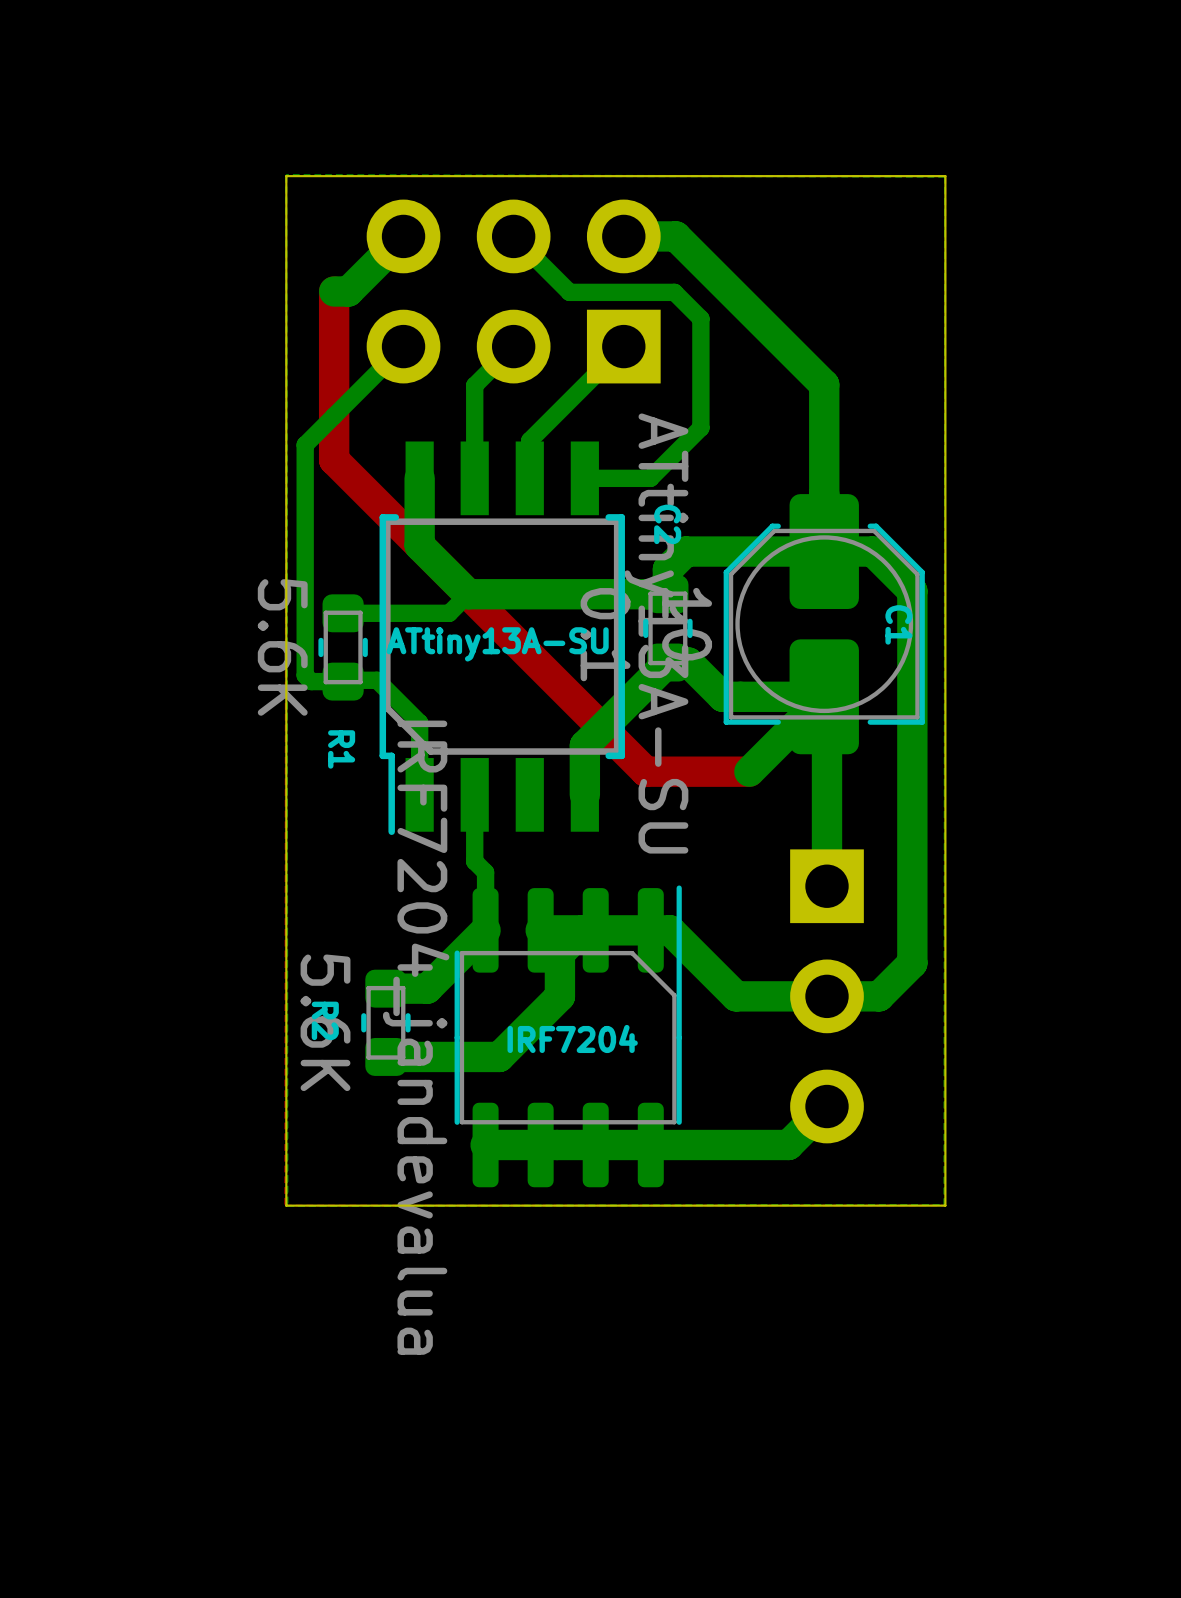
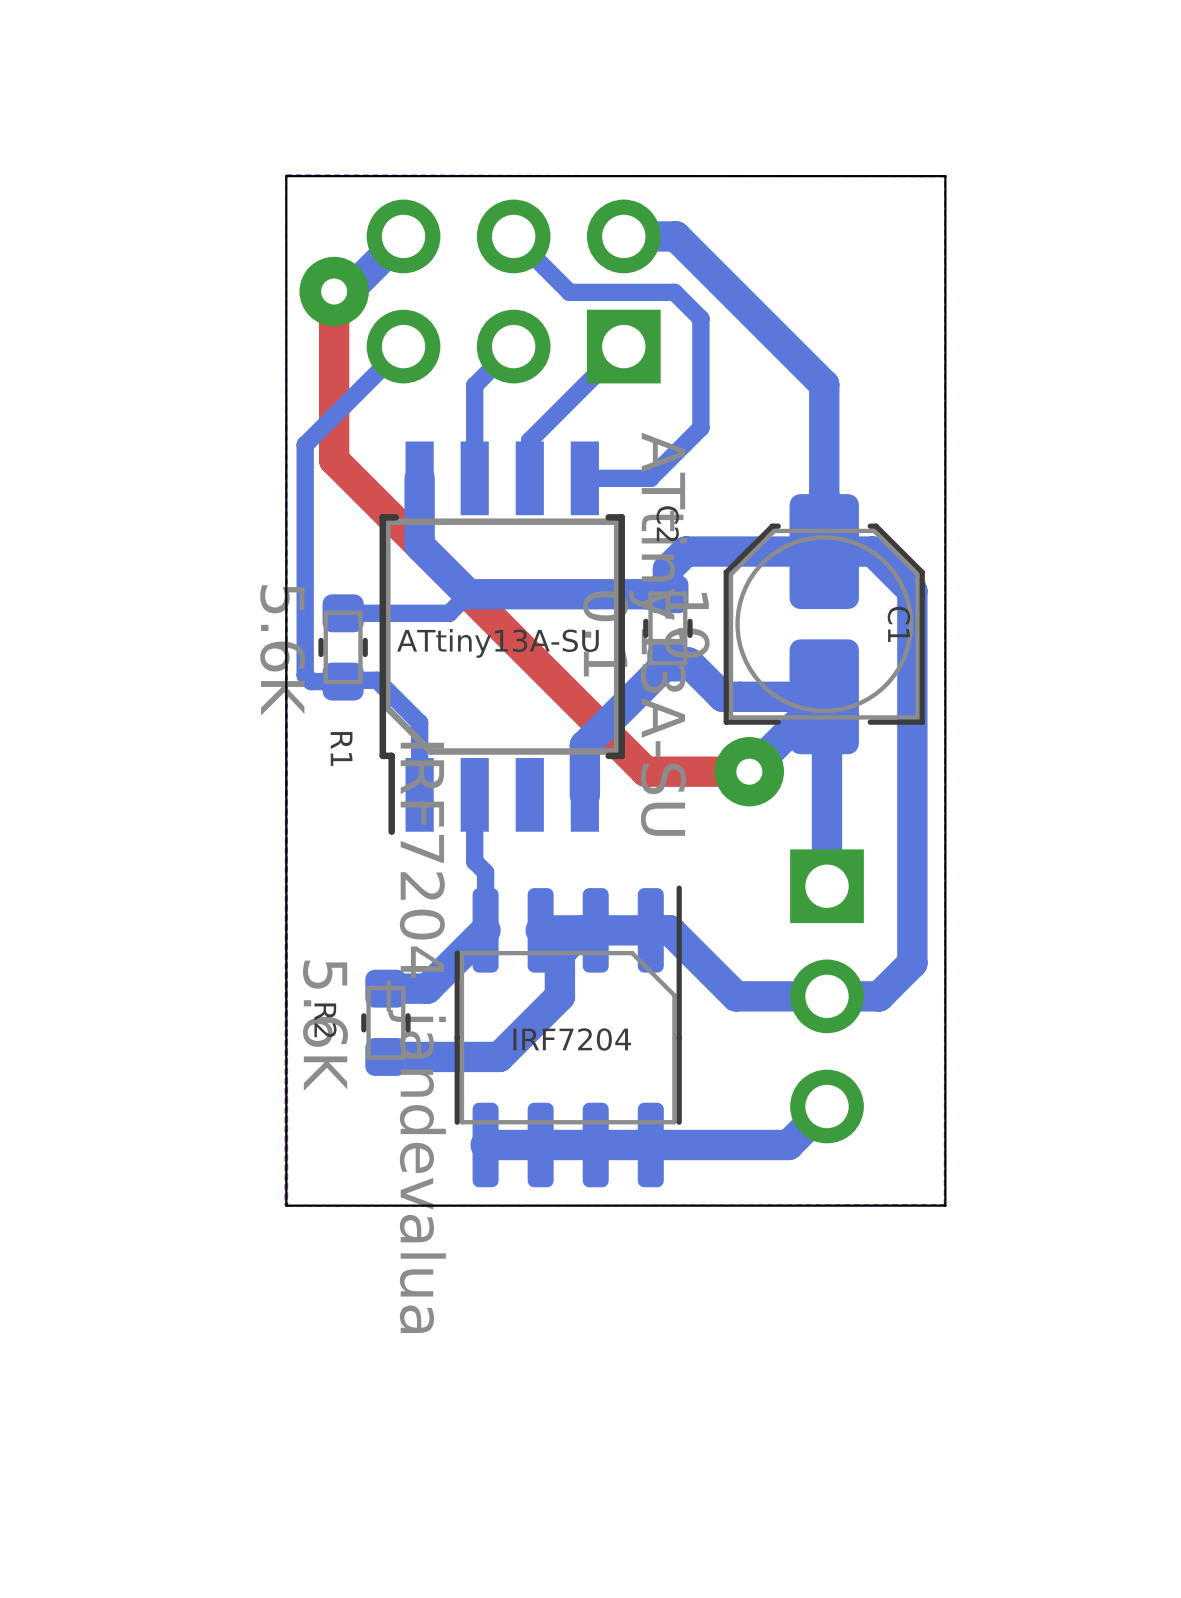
via: none -> (334, 291)
via: none -> (749, 771)

